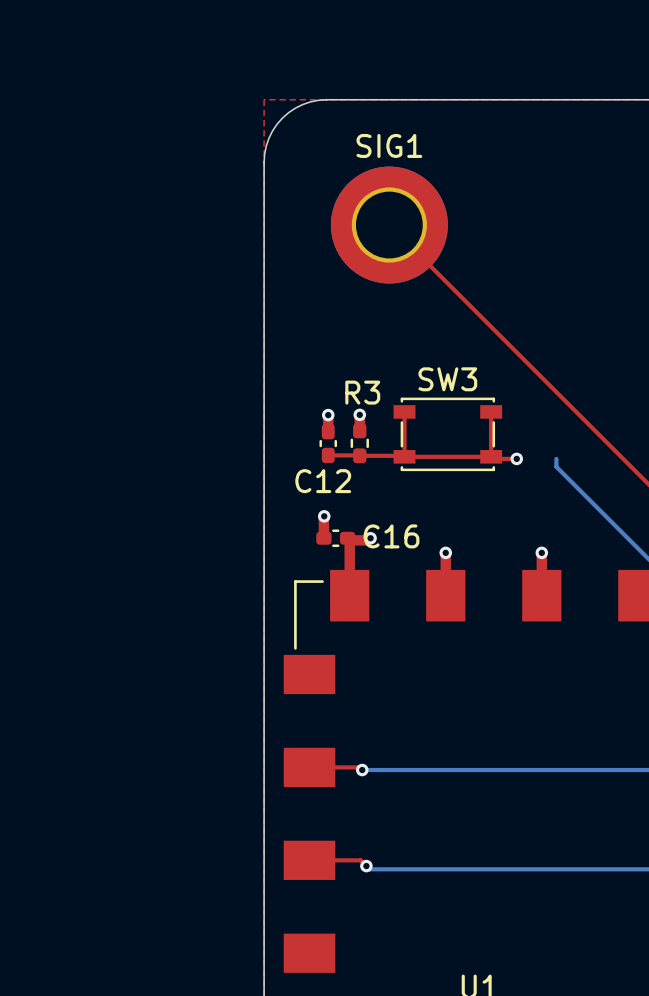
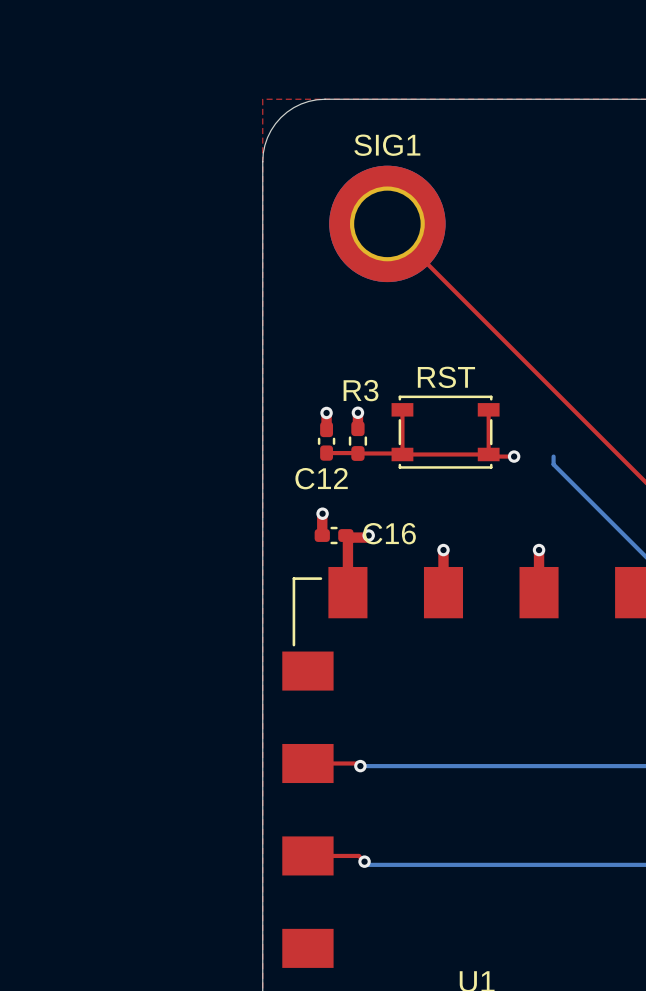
SW3 name: SW3 (447, 379) -> RST (446, 377)

